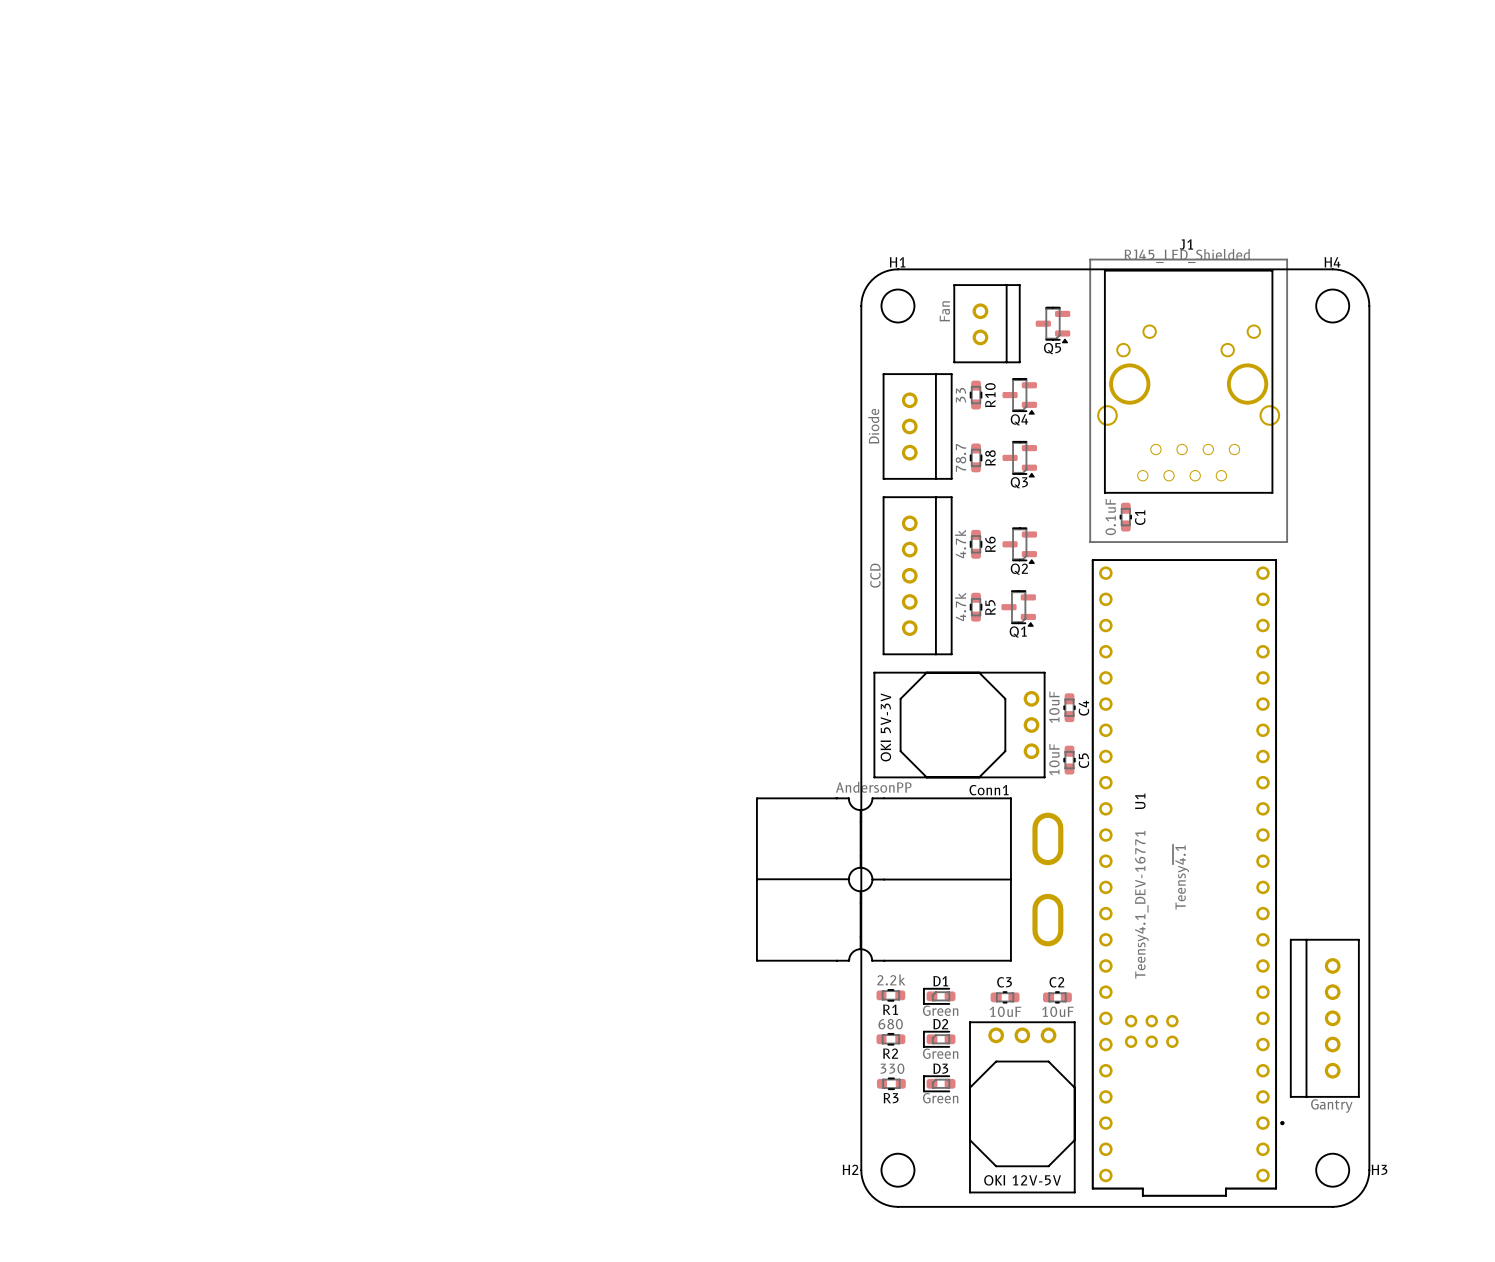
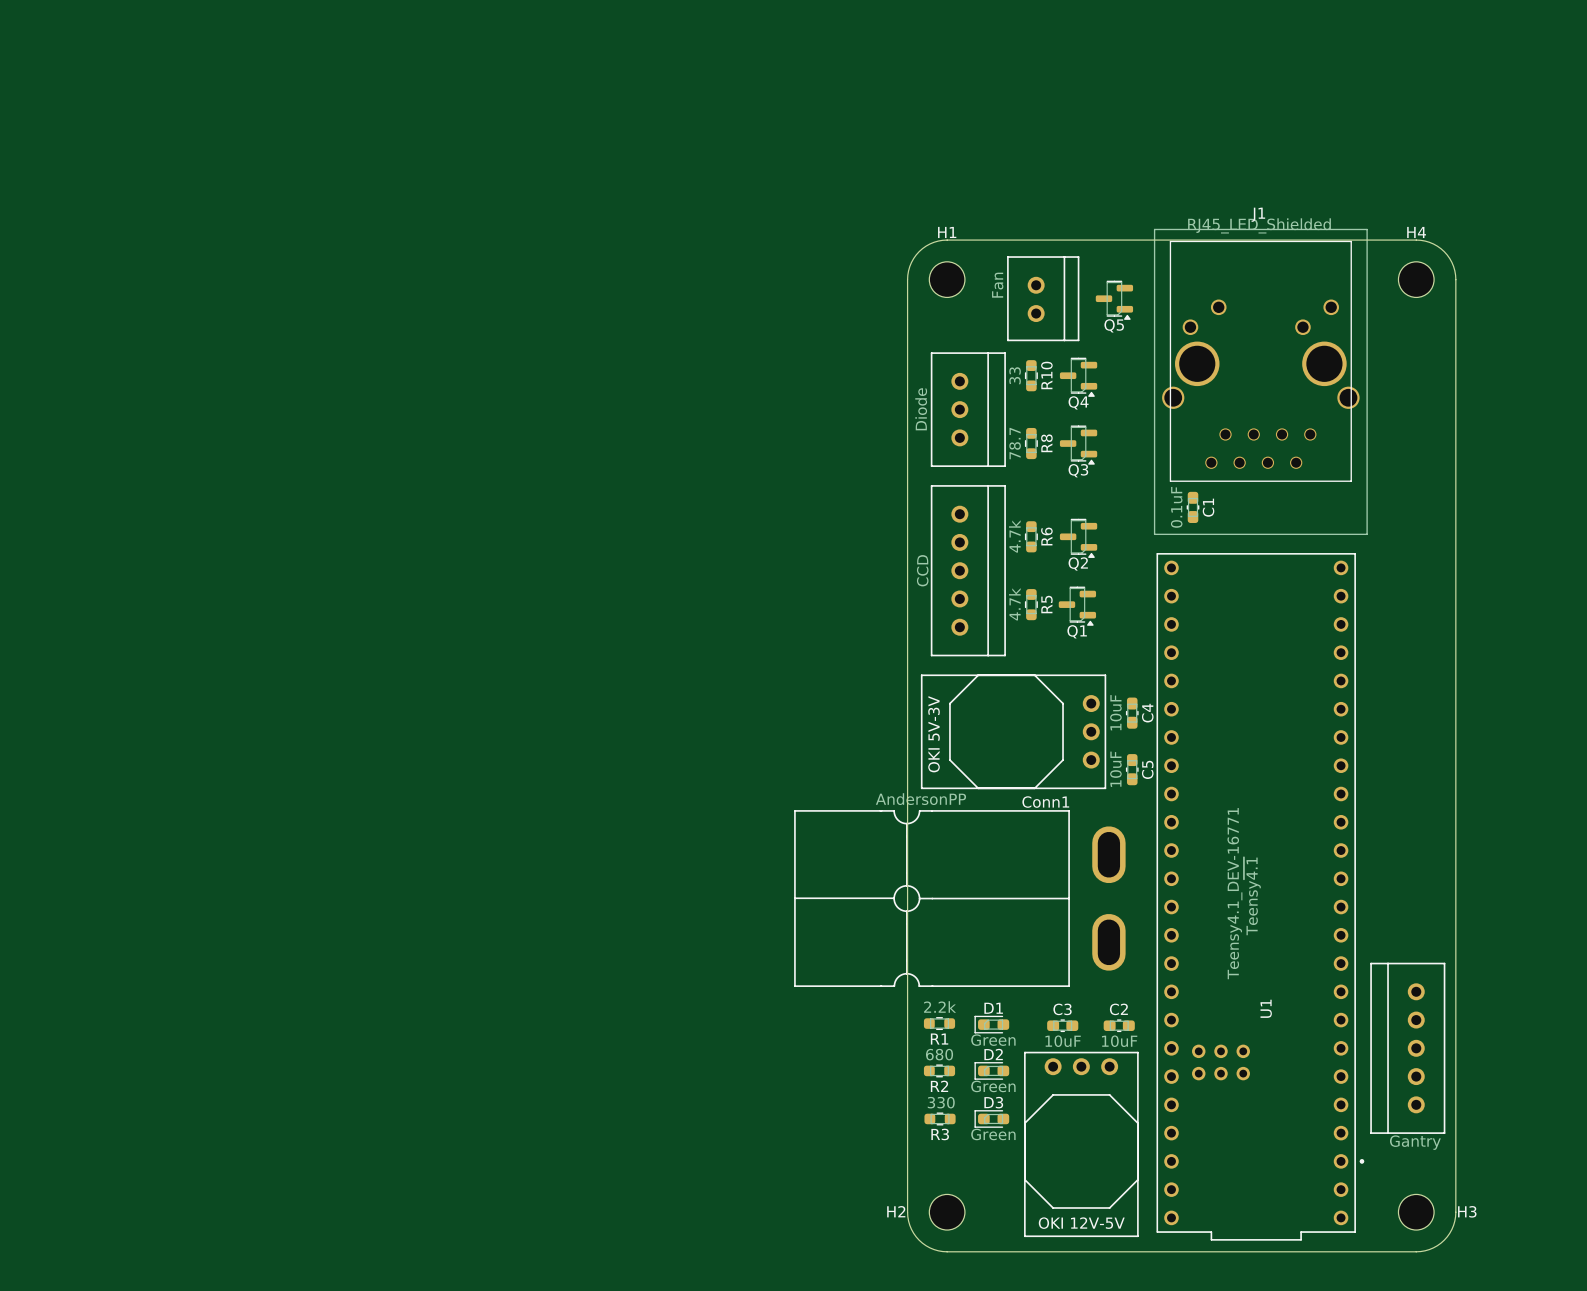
U1 name position: U1 (1140, 801) -> U1 (1266, 1008)
U1 value position: Teensy4.1_DEV-16771 (1141, 904) -> Teensy4.1_DEV-16771 (1234, 893)

